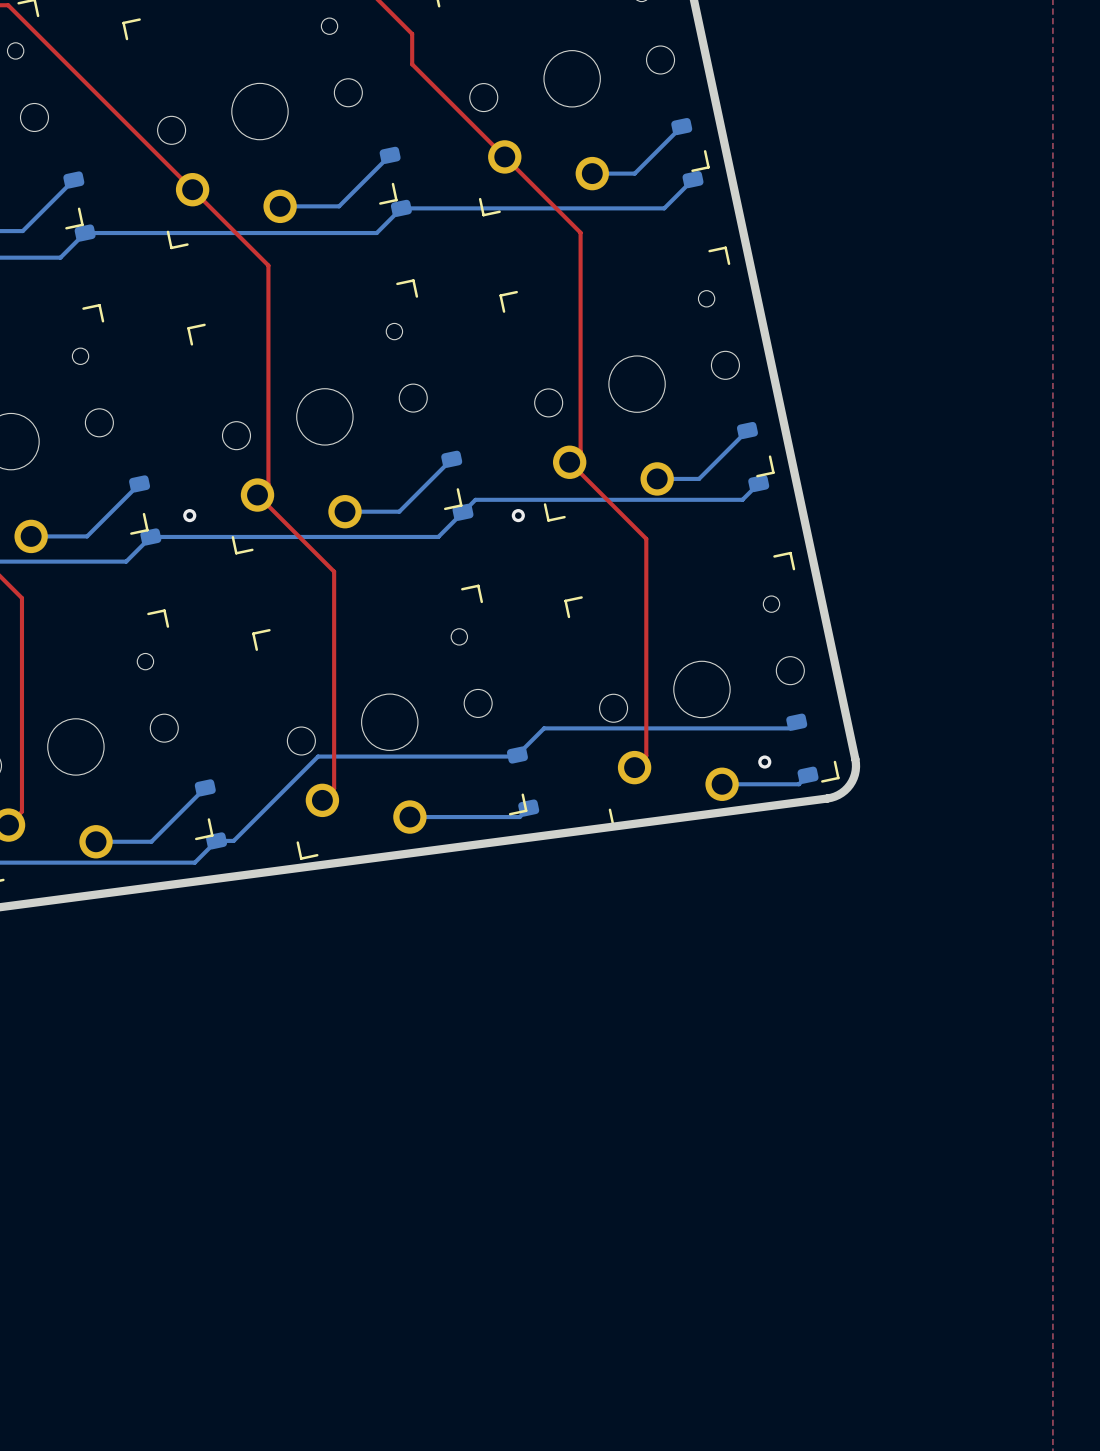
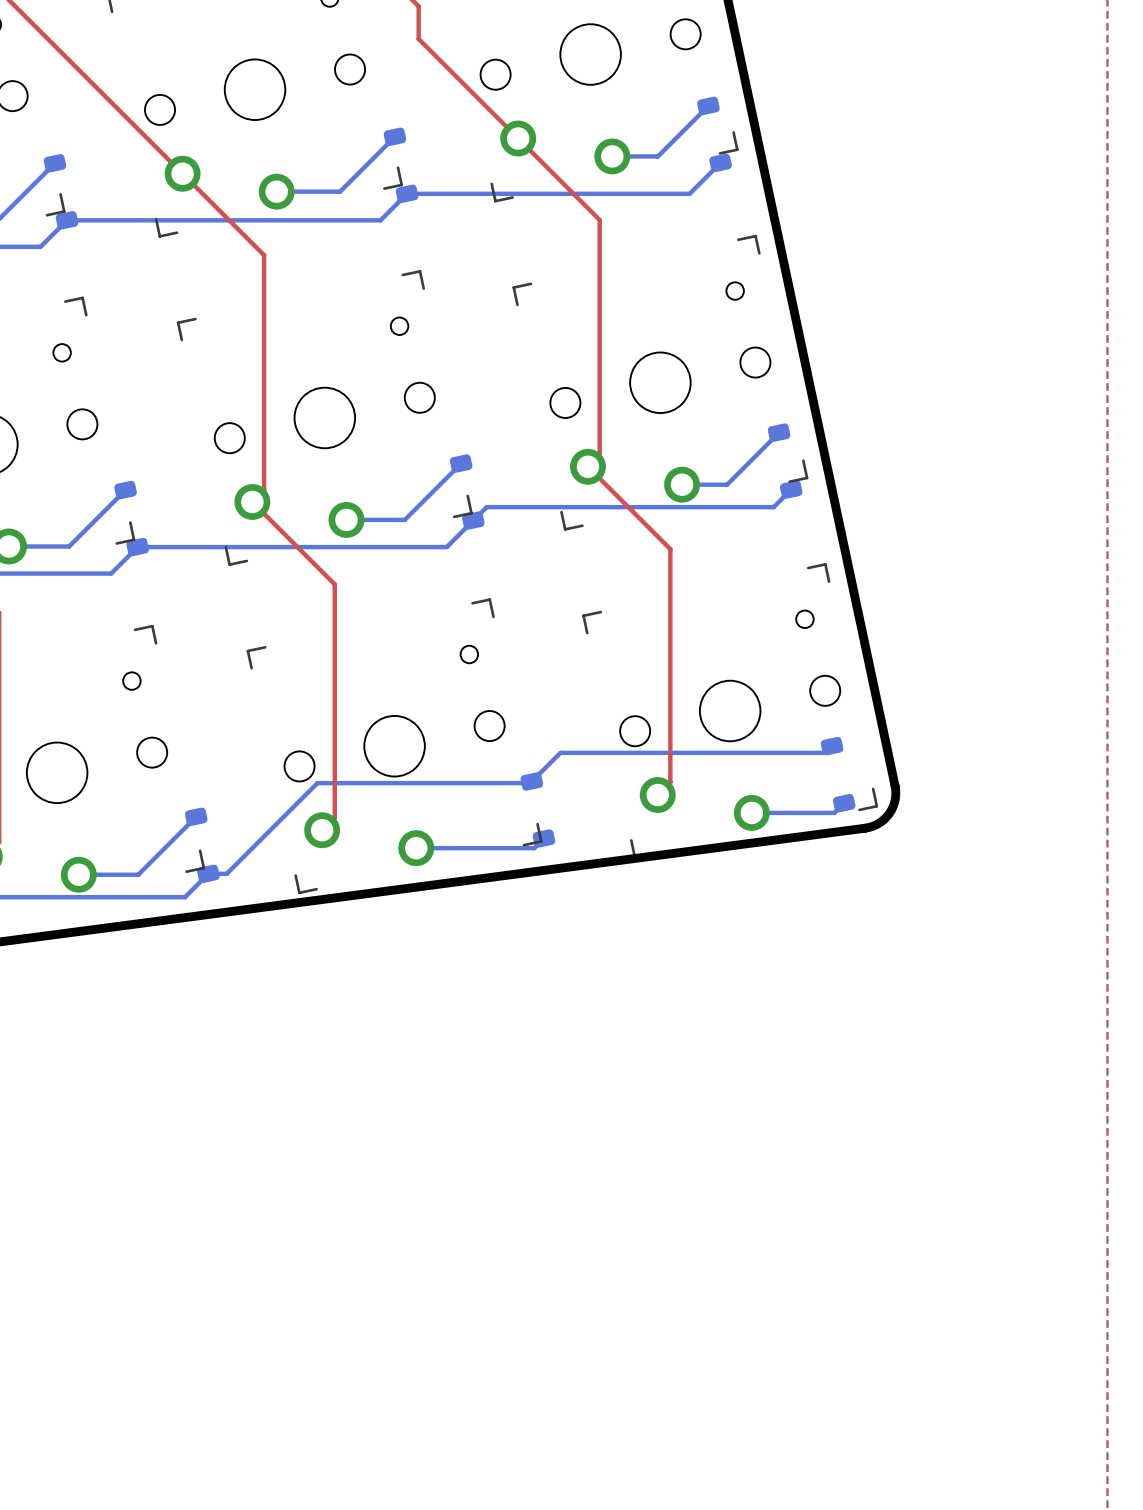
via: (189, 515) -> none
via: (518, 515) -> none
via: (764, 762) -> none

